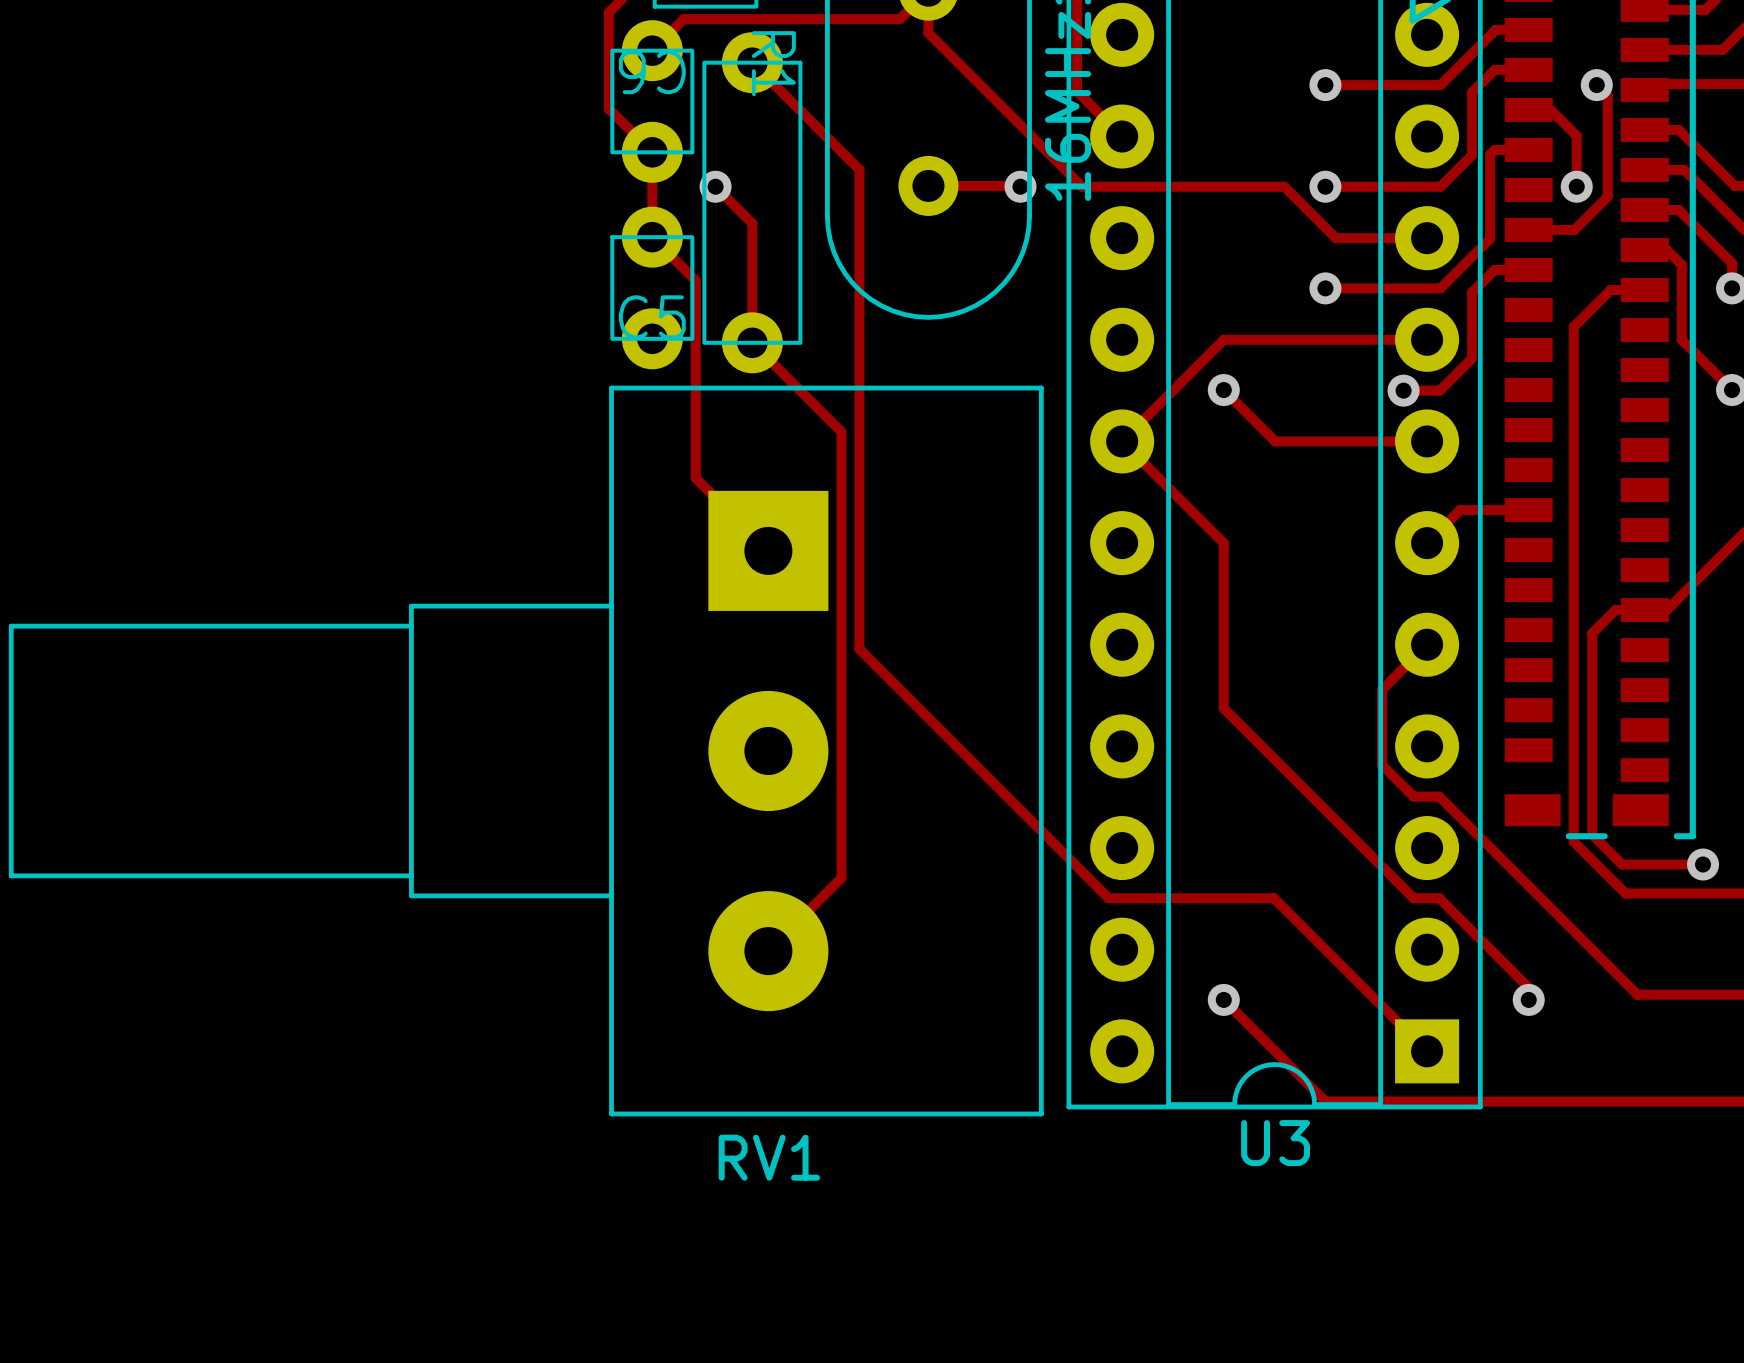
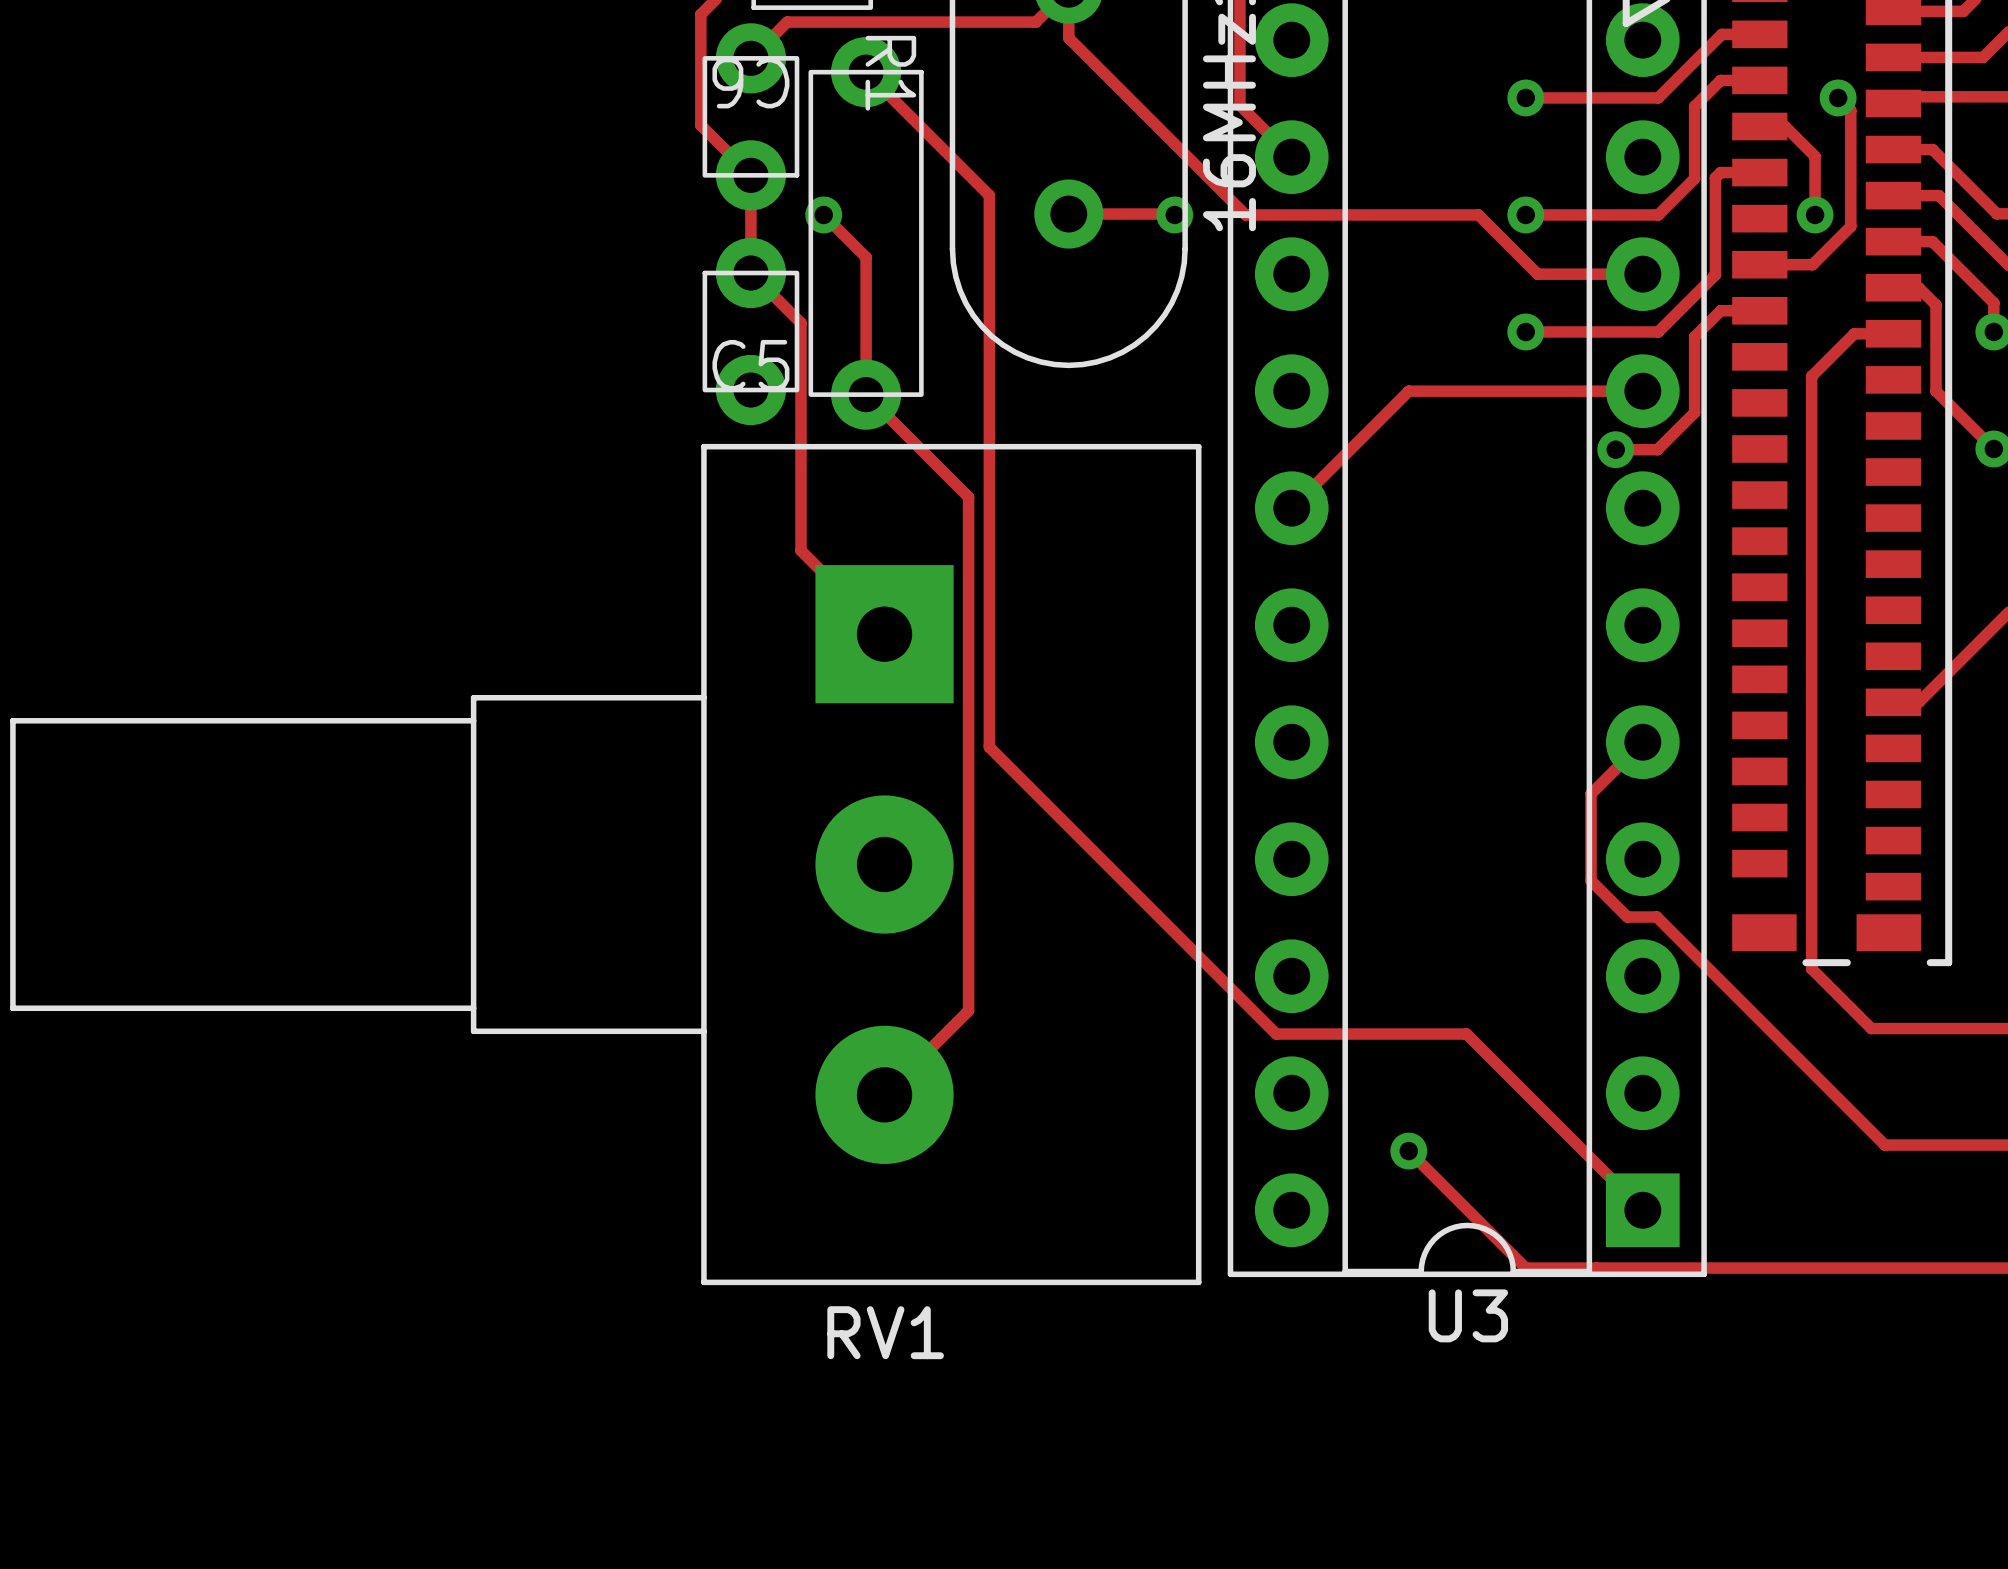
track: (1223, 390) (1275, 441) (1427, 441) -> none
via: (1223, 390) -> none
track: (1122, 441) (1223, 543) (1223, 708) (1413, 898) (1439, 898) (1528, 987) (1528, 999) -> none
track: (1528, 510) (1460, 510) (1427, 543) -> none
track: (1644, 610) (1615, 610) (1592, 633) (1592, 834) (1622, 864) (1703, 864) -> none
via: (1703, 864) -> none
via: (1528, 999) -> none

